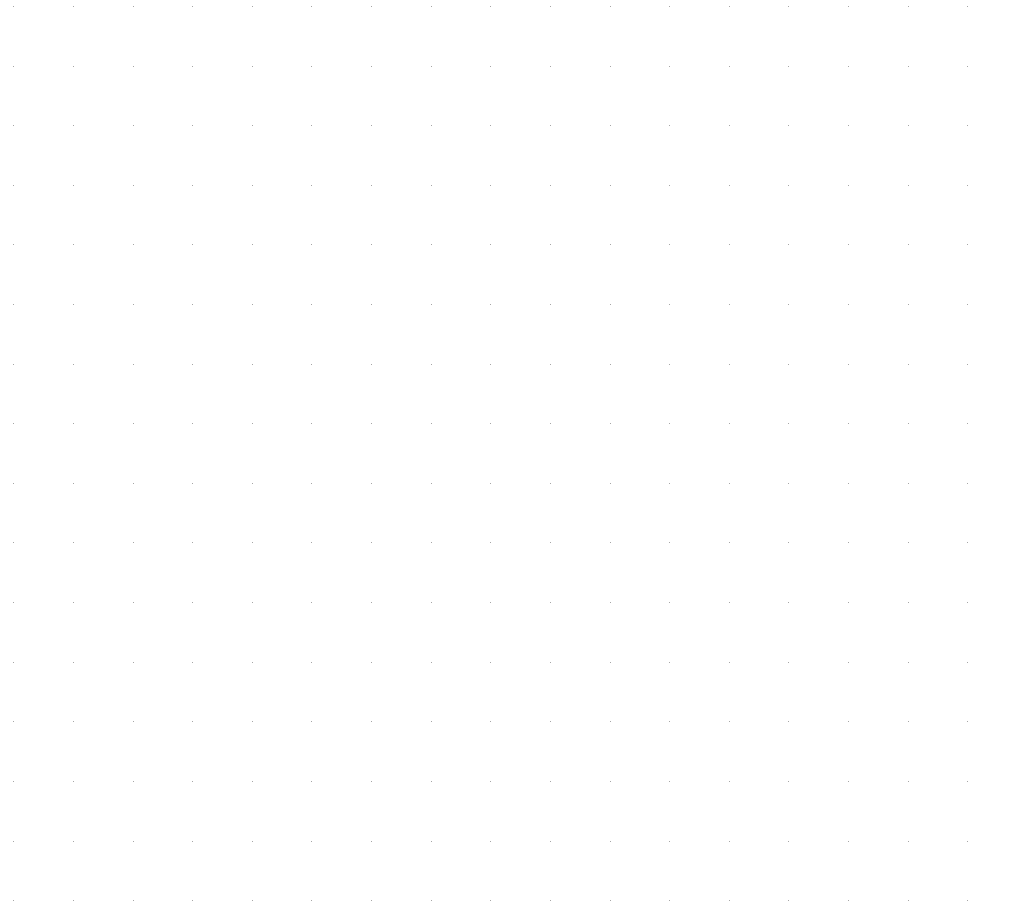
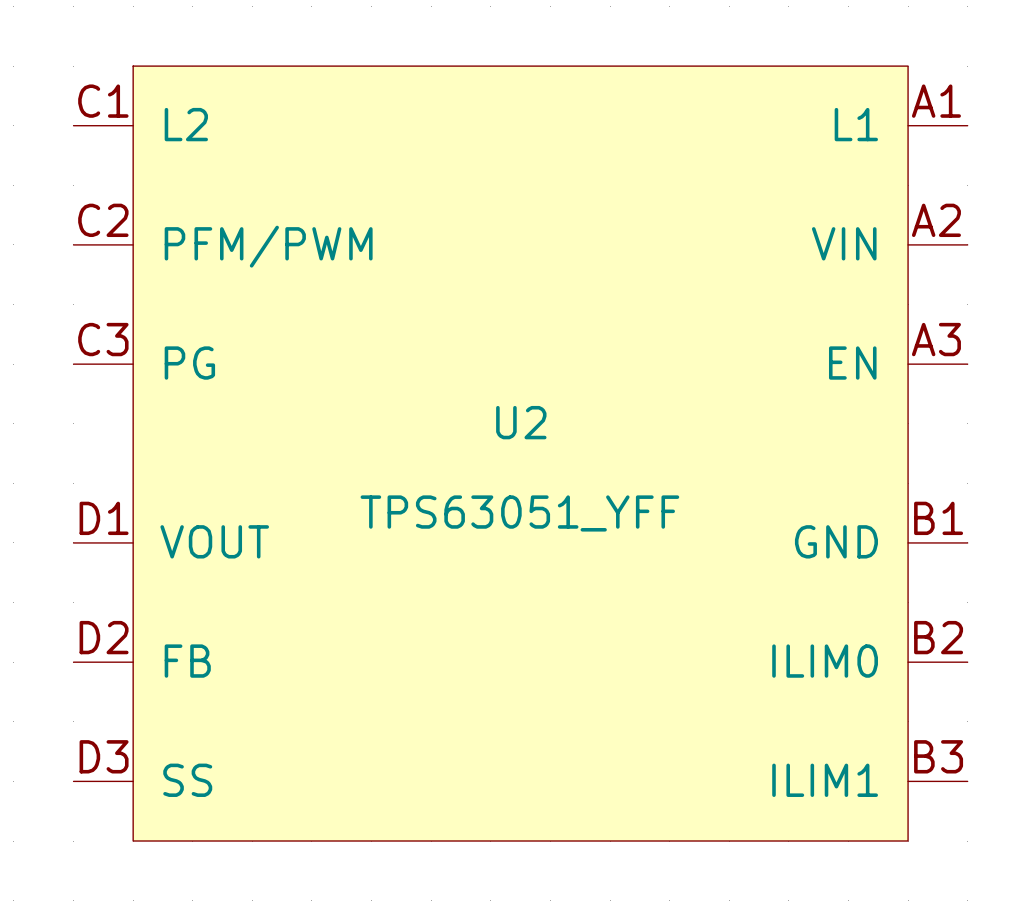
U2: none -> TPS63051_YFF (520, 453)

